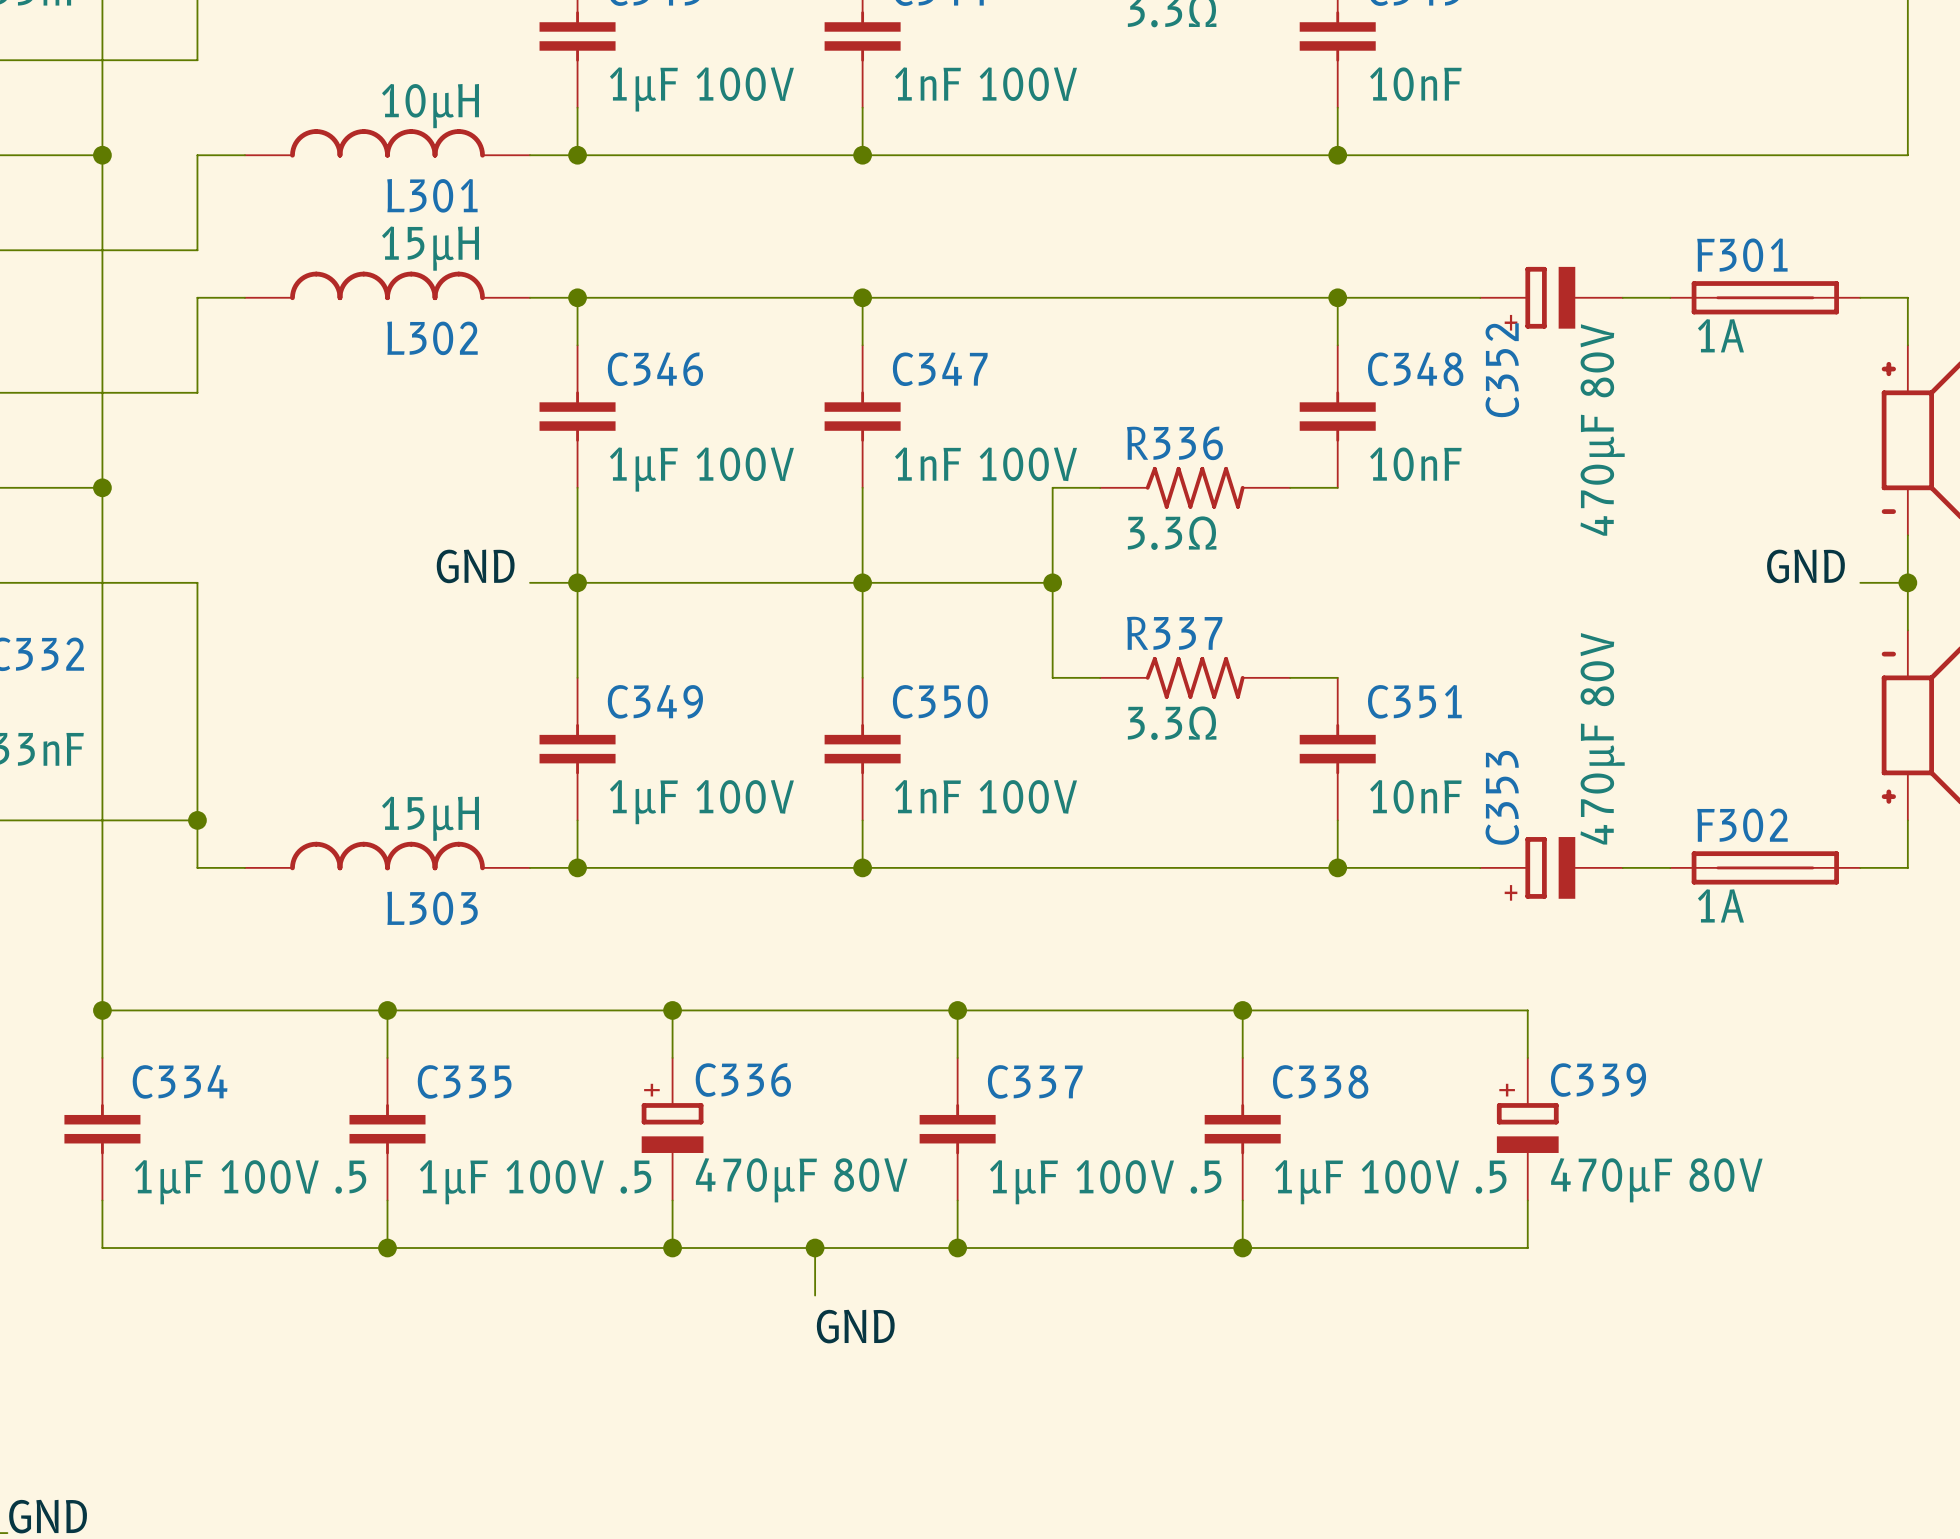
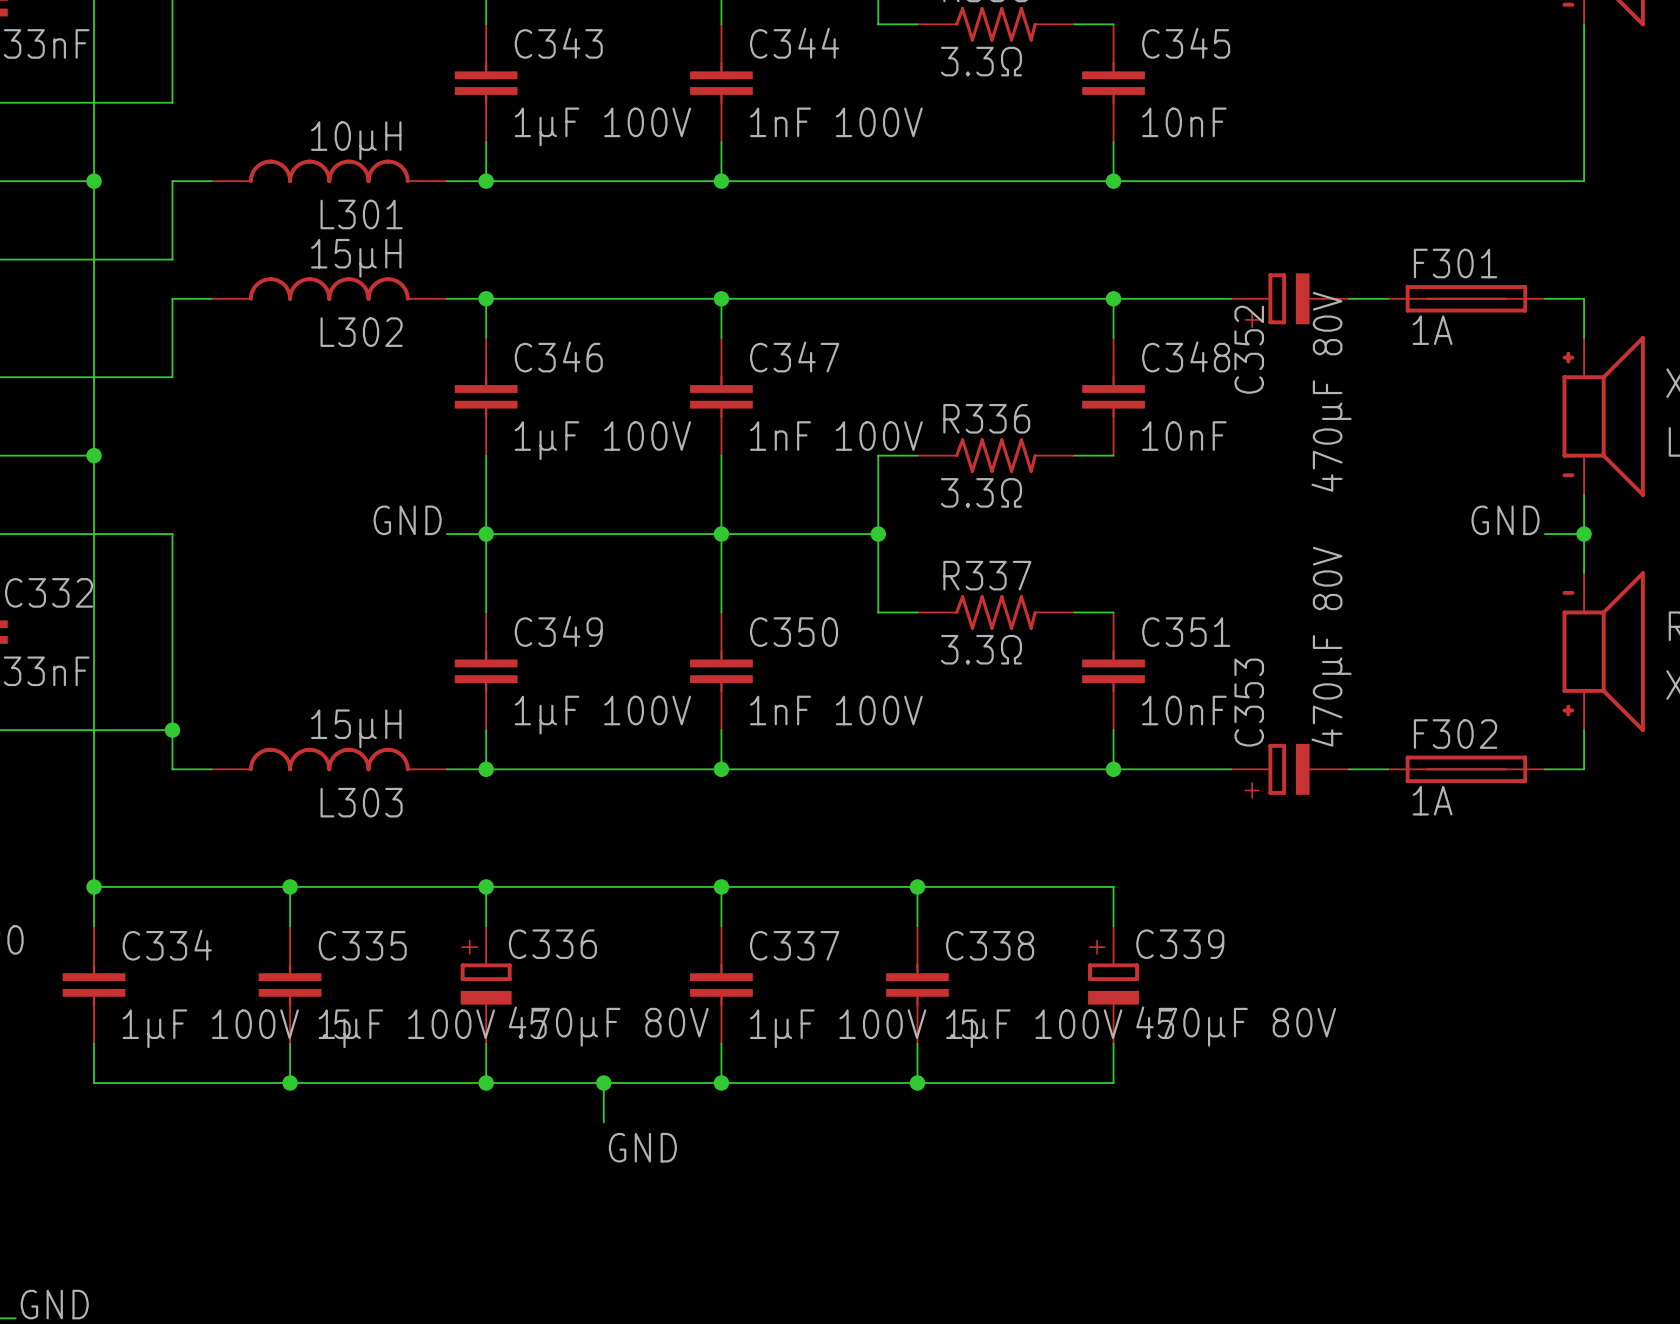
wire: (387, 1010) (387, 1057) -> (290, 886) (290, 926)
junction position: (387, 1010) -> (290, 886)
junction: none -> (486, 886)
wire: (672, 1010) (672, 1057) -> (486, 886) (486, 926)
junction: (672, 1010) -> none
junction: none -> (721, 886)
wire: (957, 1010) (957, 1057) -> (721, 886) (721, 926)
junction: (957, 1010) -> none
junction: none -> (917, 886)
wire: (1242, 1010) (1242, 1057) -> (917, 886) (917, 926)
junction: (1242, 1010) -> none
wire: (1337, 1010) (1527, 1010) (1527, 1057) -> (1113, 886) (1113, 926)
C335 position: (387, 1129) -> (290, 984)
C336 position: (672, 1129) -> (486, 984)
C337 position: (957, 1129) -> (721, 984)
C338 position: (1242, 1129) -> (917, 984)
C339 position: (1527, 1129) -> (1113, 984)
wire: (387, 1200) (387, 1248) -> (290, 1043) (290, 1083)
wire: (672, 1200) (672, 1248) -> (486, 1043) (486, 1083)
wire: (957, 1200) (957, 1248) -> (721, 1043) (721, 1083)
wire: (1242, 1200) (1242, 1248) -> (917, 1043) (917, 1083)
wire: (1527, 1200) (1527, 1248) (1337, 1248) -> (1113, 1043) (1113, 1083)
junction position: (387, 1248) -> (290, 1083)
junction: none -> (486, 1083)
junction: (672, 1248) -> none
junction: none -> (603, 1083)
wire: (815, 1248) (815, 1295) -> (603, 1083) (603, 1122)
junction: (815, 1248) -> none
junction: none -> (721, 1083)
junction: (957, 1248) -> none
junction: none -> (917, 1083)
junction: (1242, 1248) -> none
label position: GND (855, 1326) -> GND (642, 1147)

